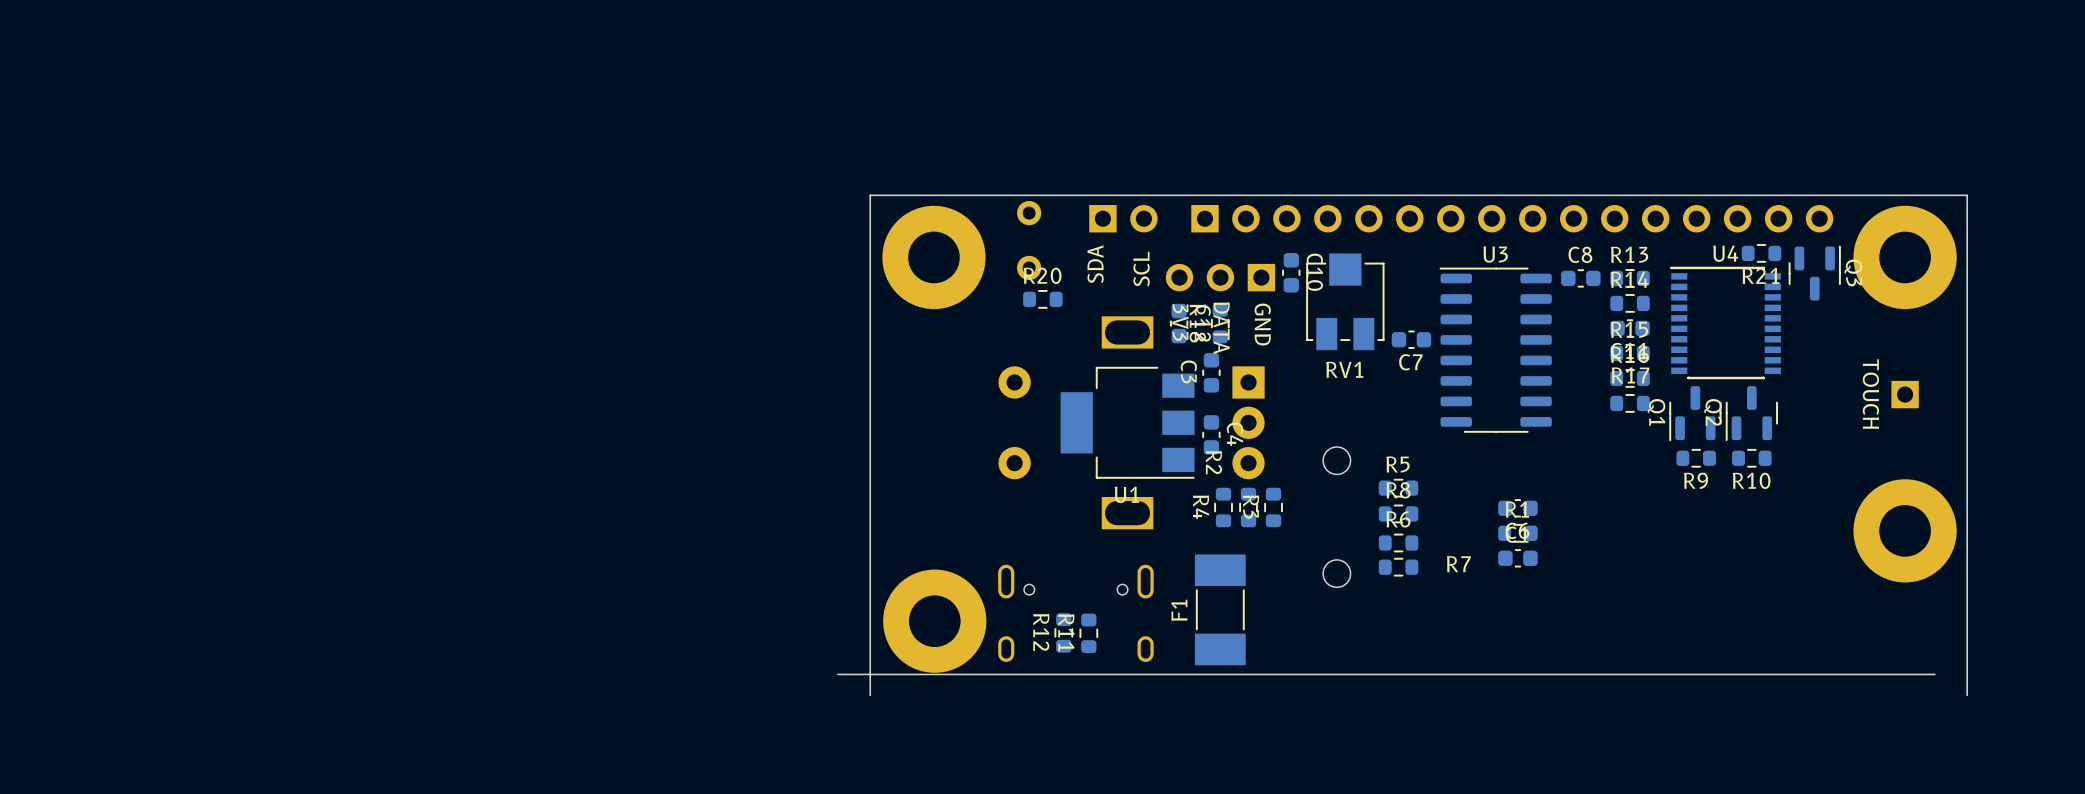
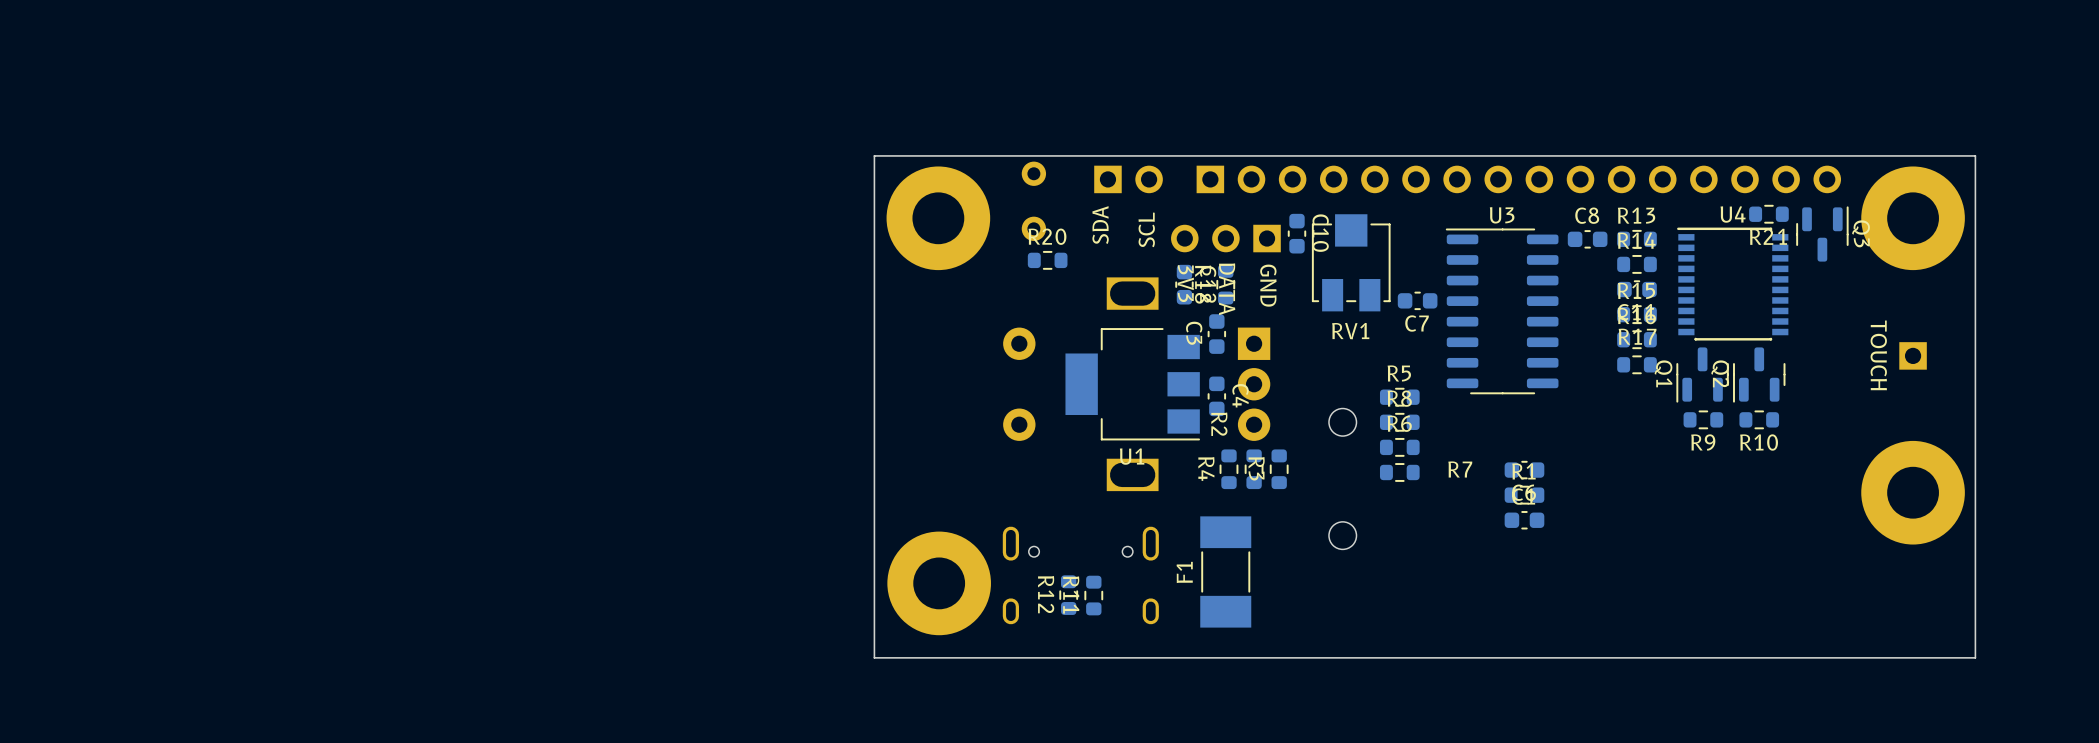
R5 position: (1398, 488) -> (1399, 397)
R8 position: (1398, 513) -> (1399, 422)
R6 position: (1398, 542) -> (1399, 447)
R7 position: (1398, 567) -> (1399, 472)
board edge: (1934, 674) (837, 674) -> (1975, 657) (874, 657)

